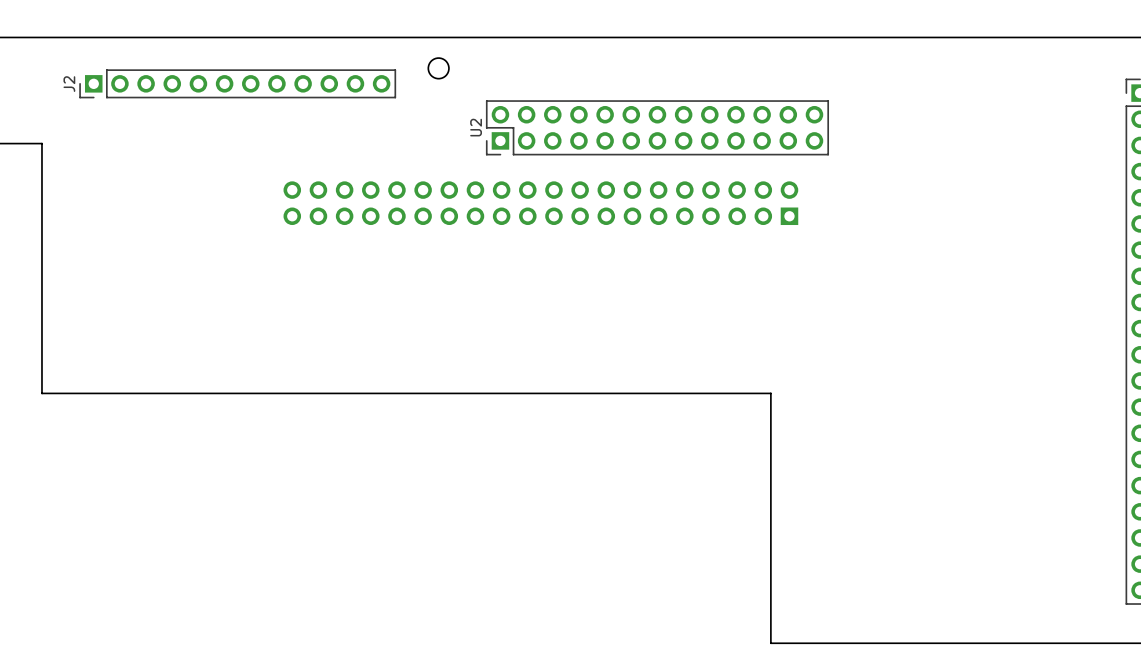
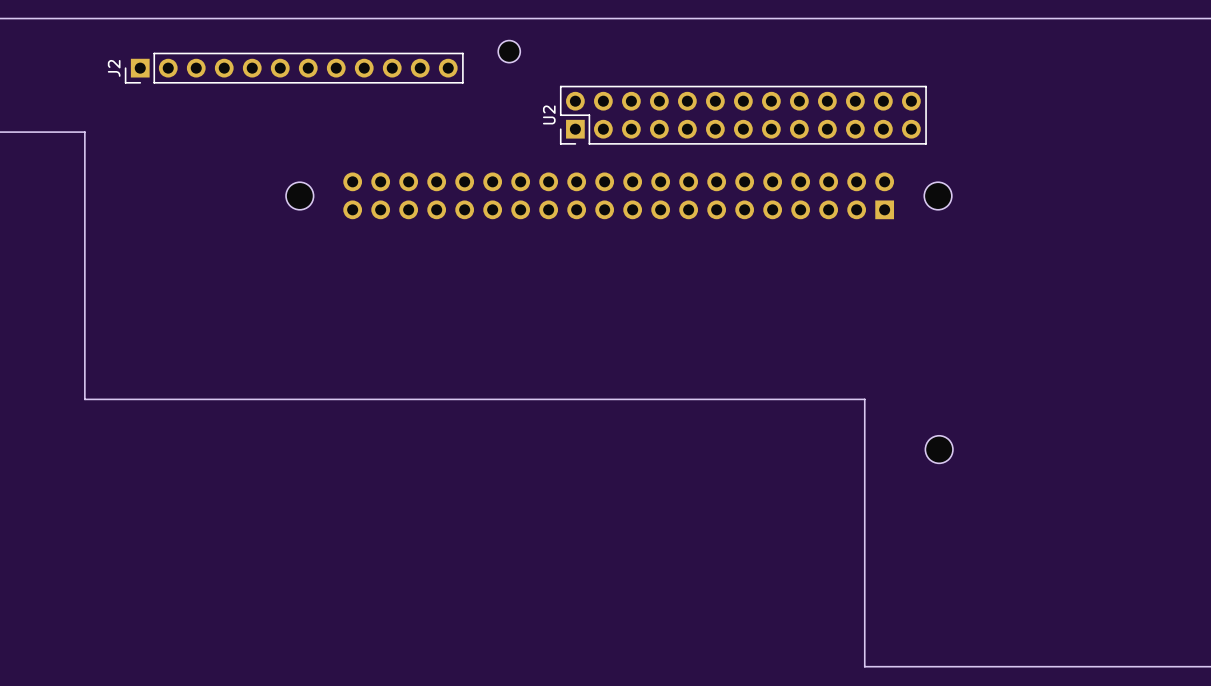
part: none -> (299, 196)
part: none -> (938, 196)
part: none -> (939, 449)

